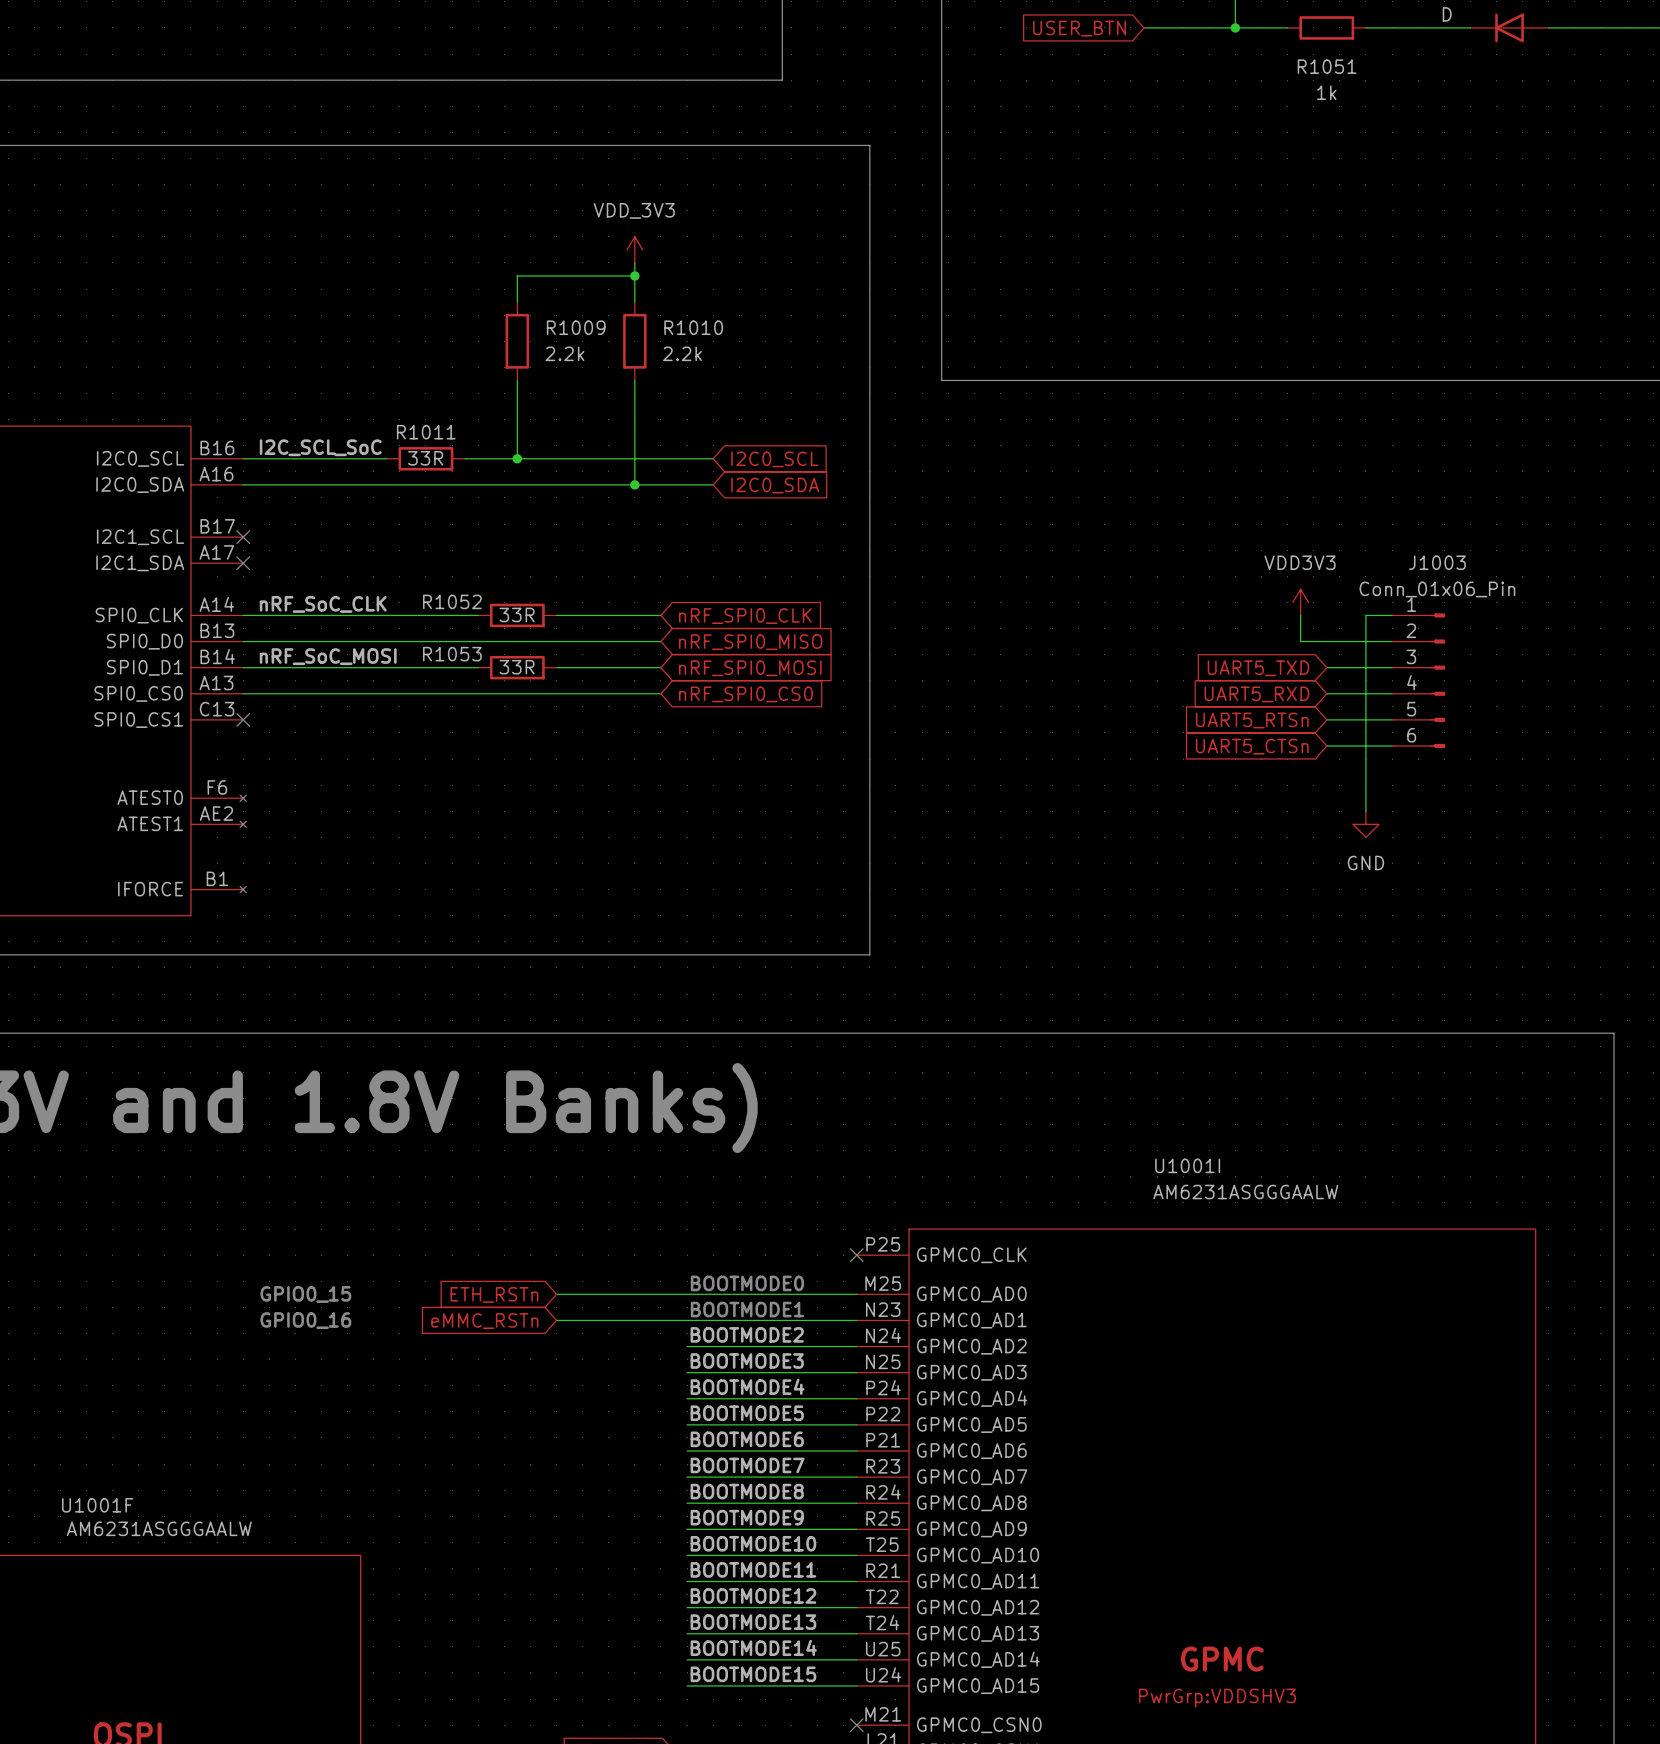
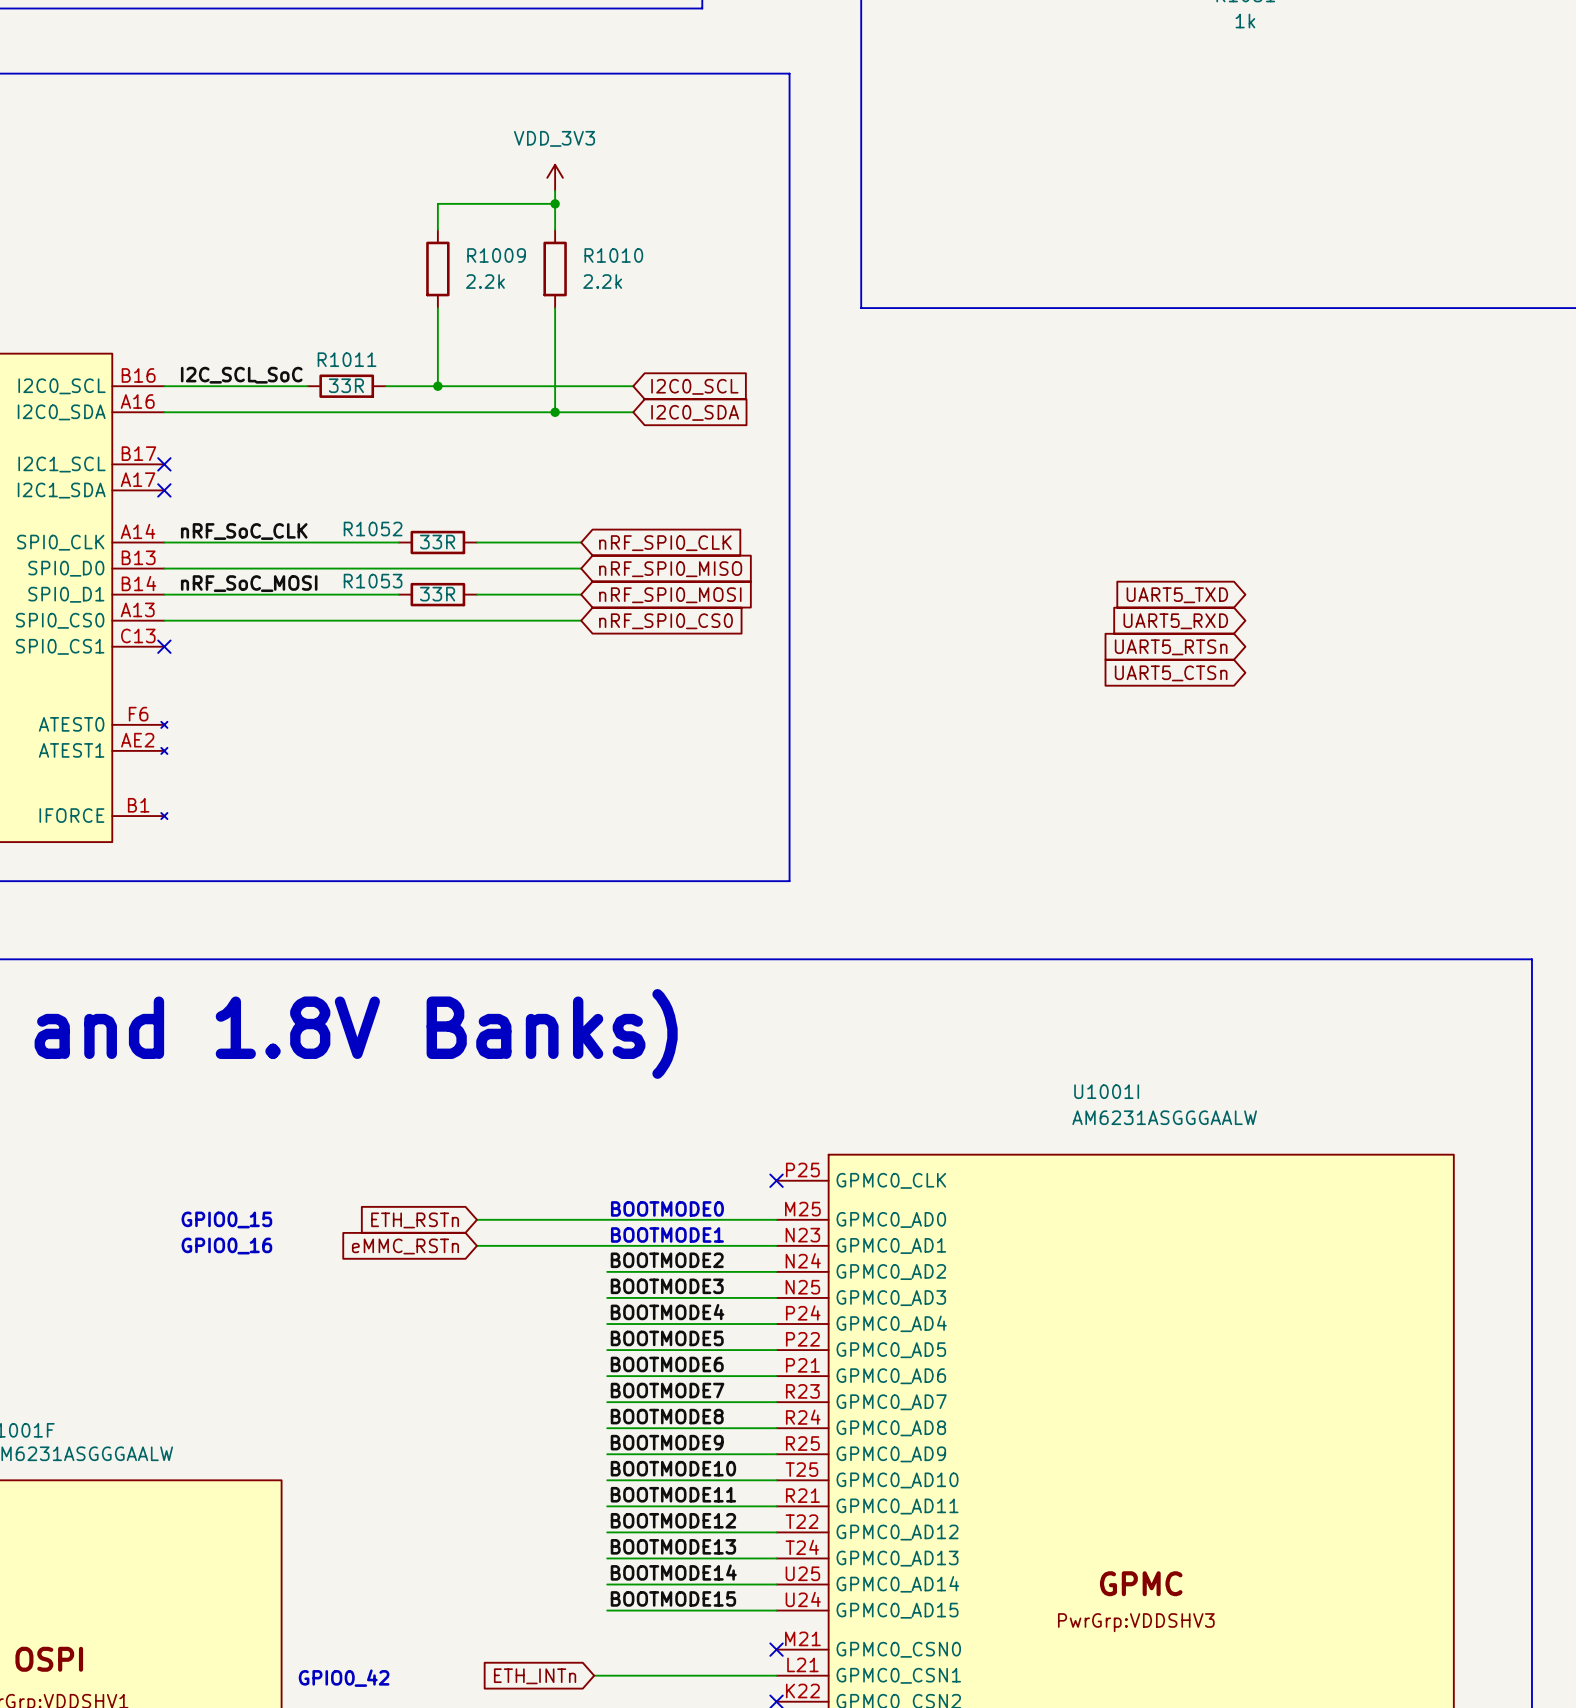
power symbol: VDD3V3 (1300, 602) -> none
wire: (1300, 615) (1300, 641) (1392, 641) -> none
wire: (1392, 615) (1365, 615) (1365, 811) -> none
wire: (1326, 667) (1392, 667) -> none
J1003: Conn_01x06_Pin (1418, 680) -> none
wire: (1326, 693) (1392, 693) -> none
wire: (1326, 719) (1392, 719) -> none
wire: (1326, 746) (1392, 746) -> none
power symbol: GND (1365, 824) -> none

